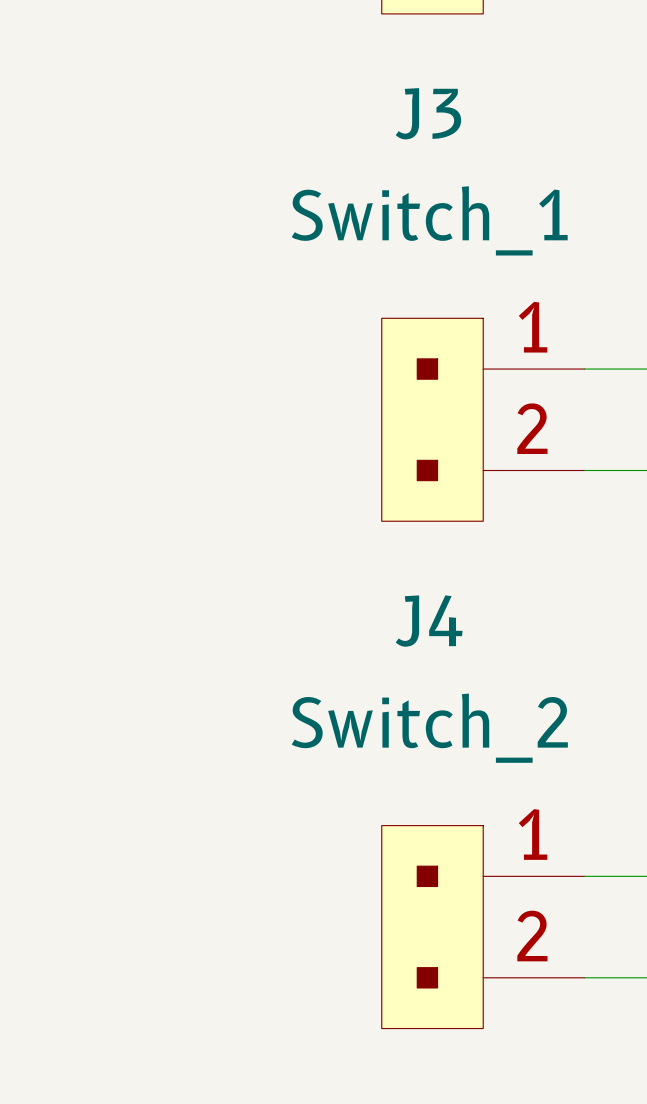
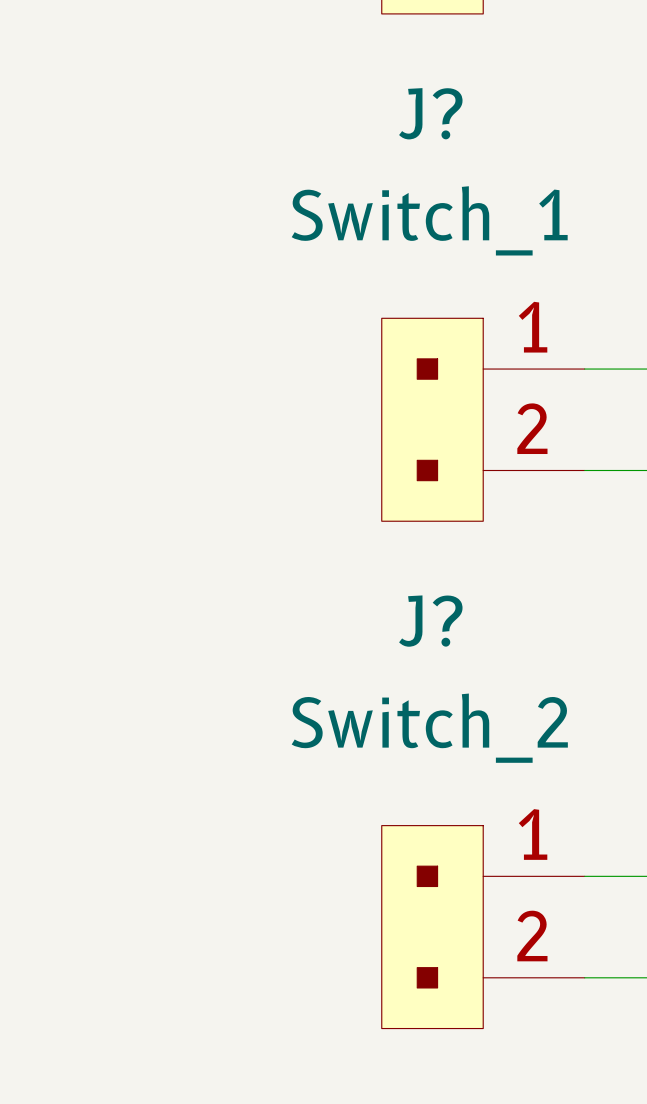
J3 name: J3 (428, 113) -> J? (430, 113)
J4 name: J4 (429, 621) -> J? (430, 621)

